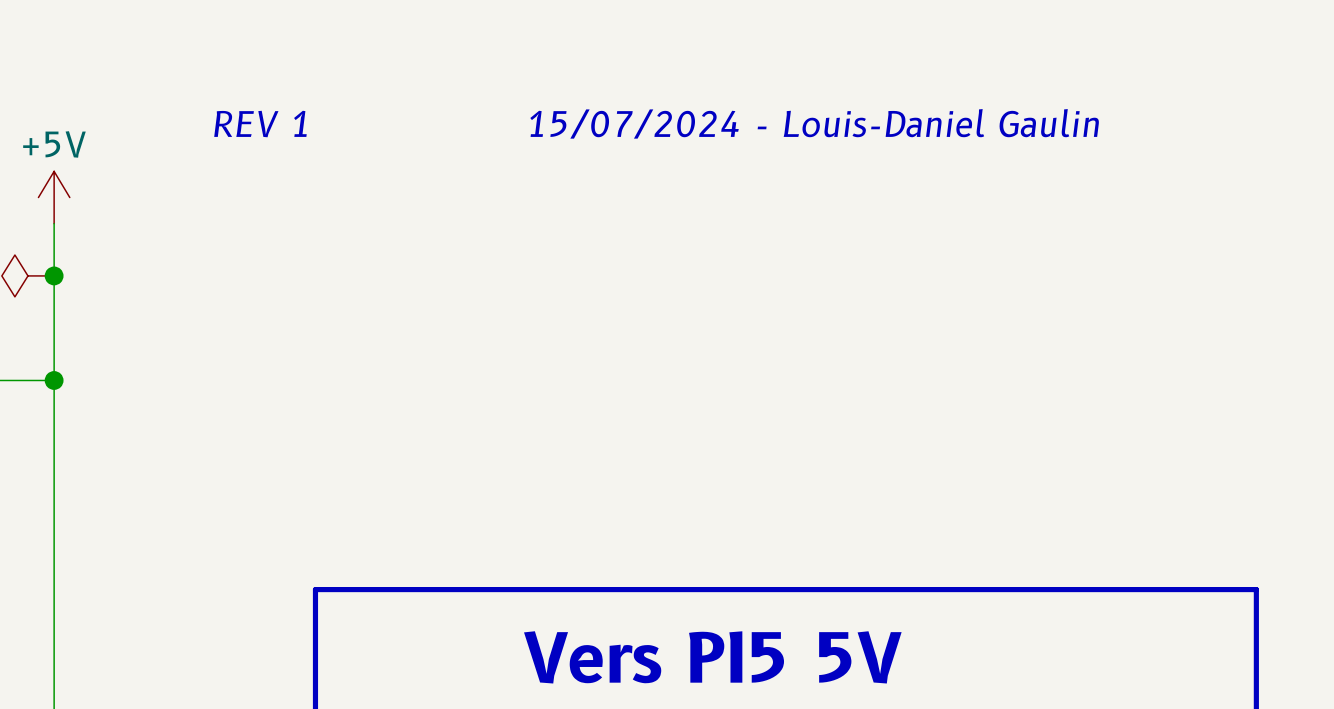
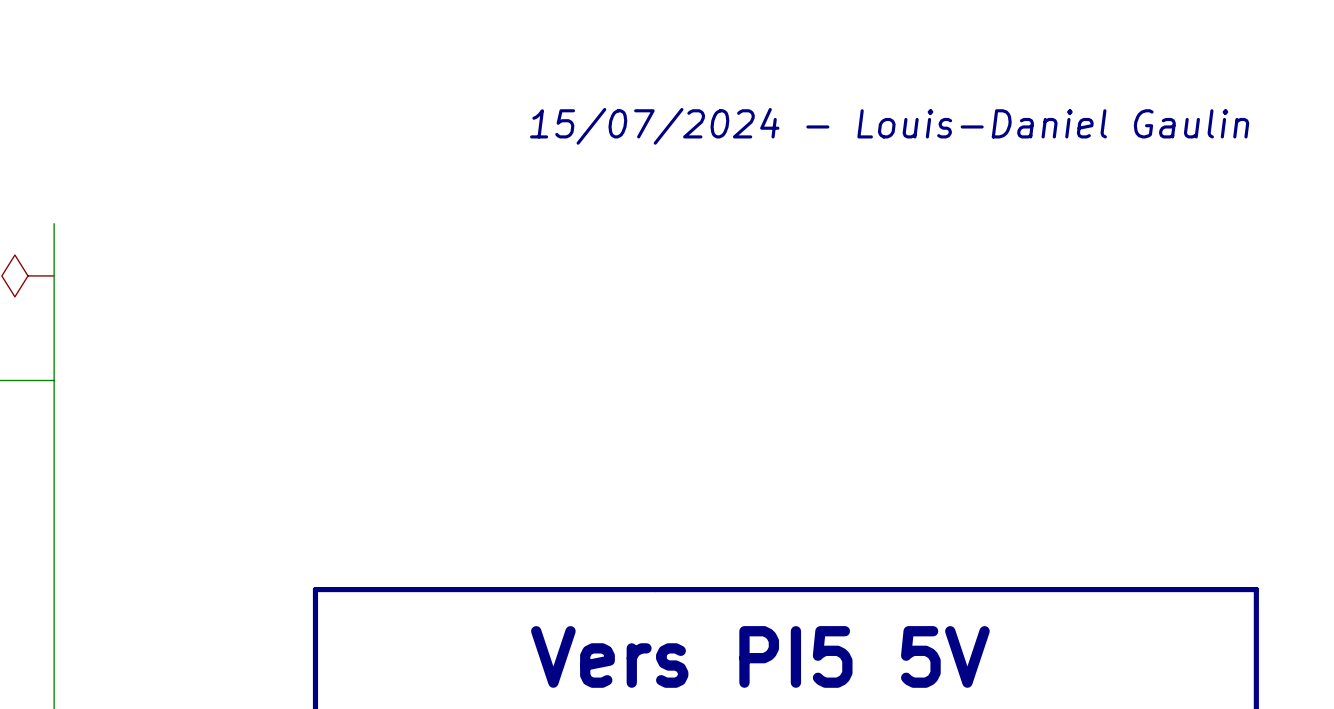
text: REV 1 (260, 124) -> none
power symbol: +5V (54, 197) -> none
junction: (54, 275) -> none
junction: (54, 380) -> none

